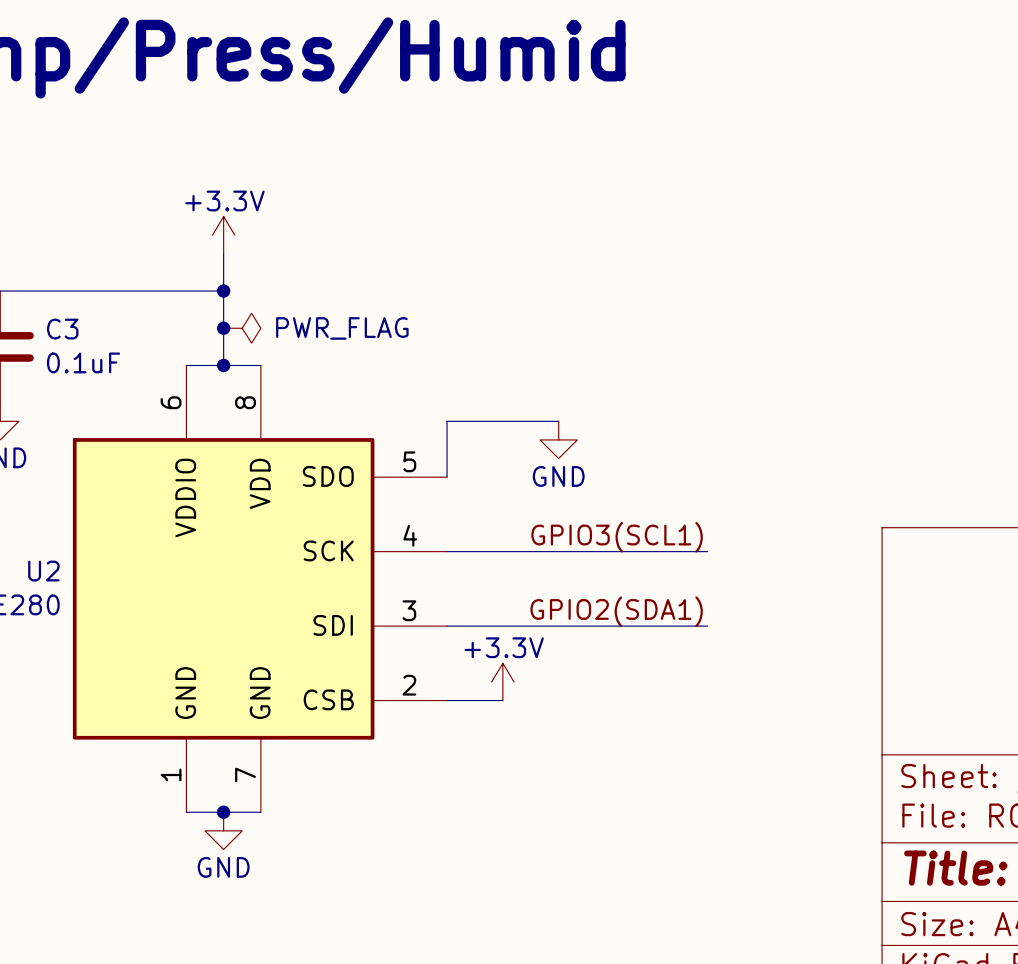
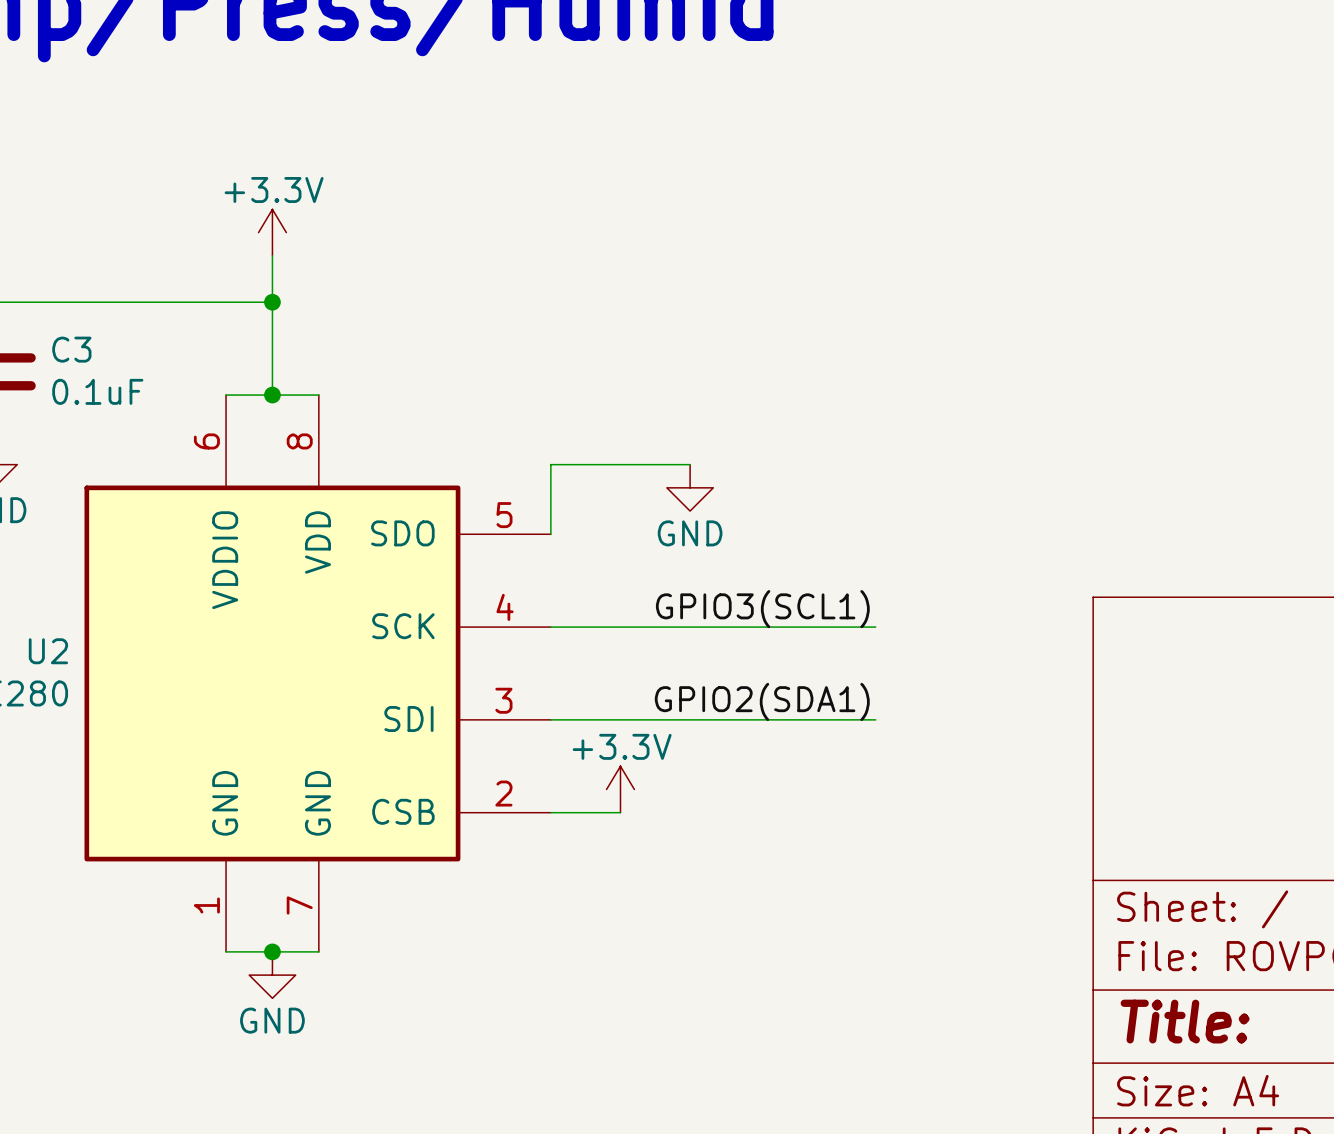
junction: (223, 328) -> none
power symbol: PWR_FLAG (242, 328) -> none

